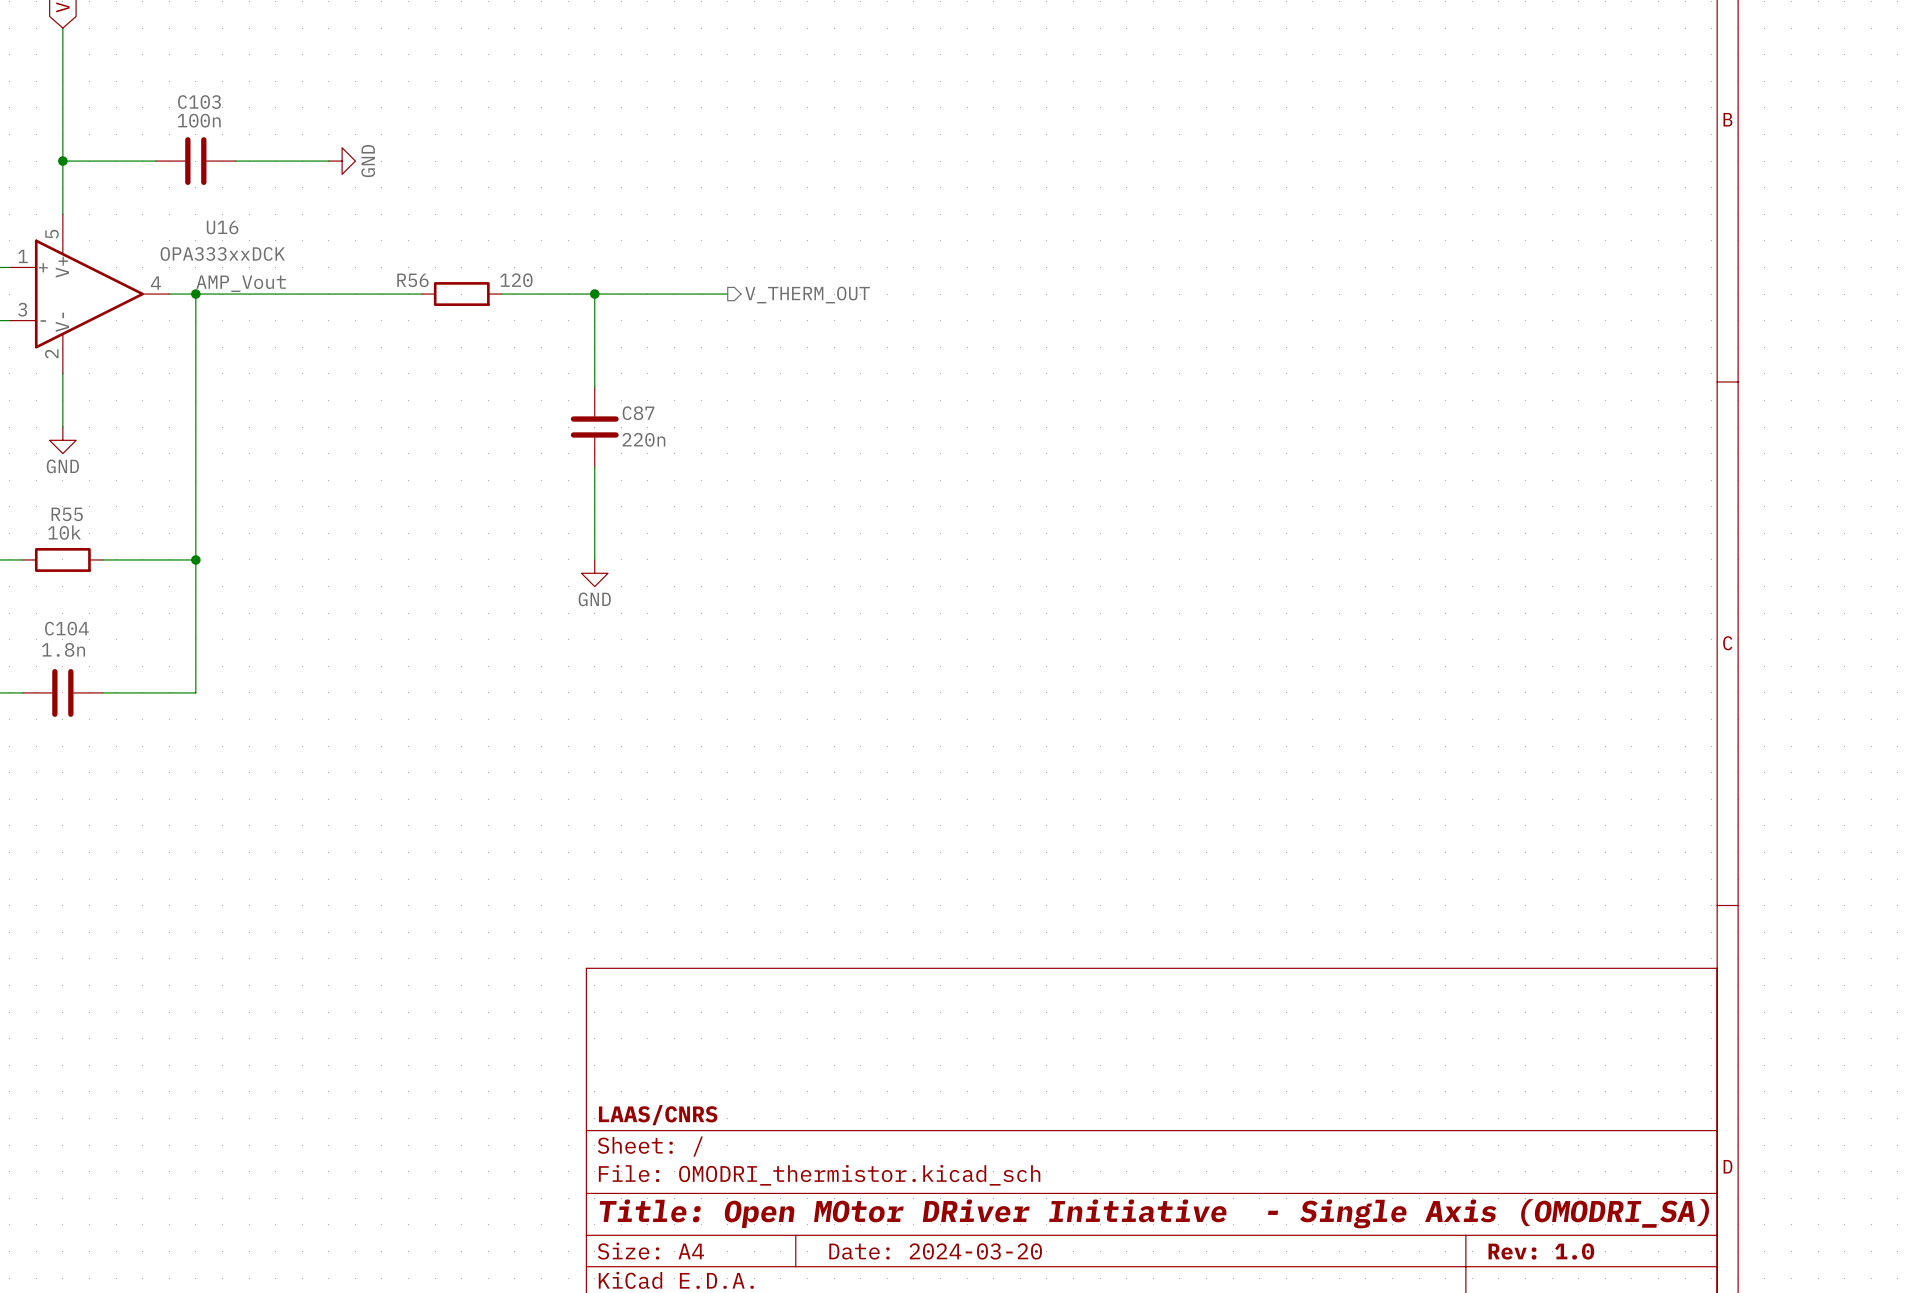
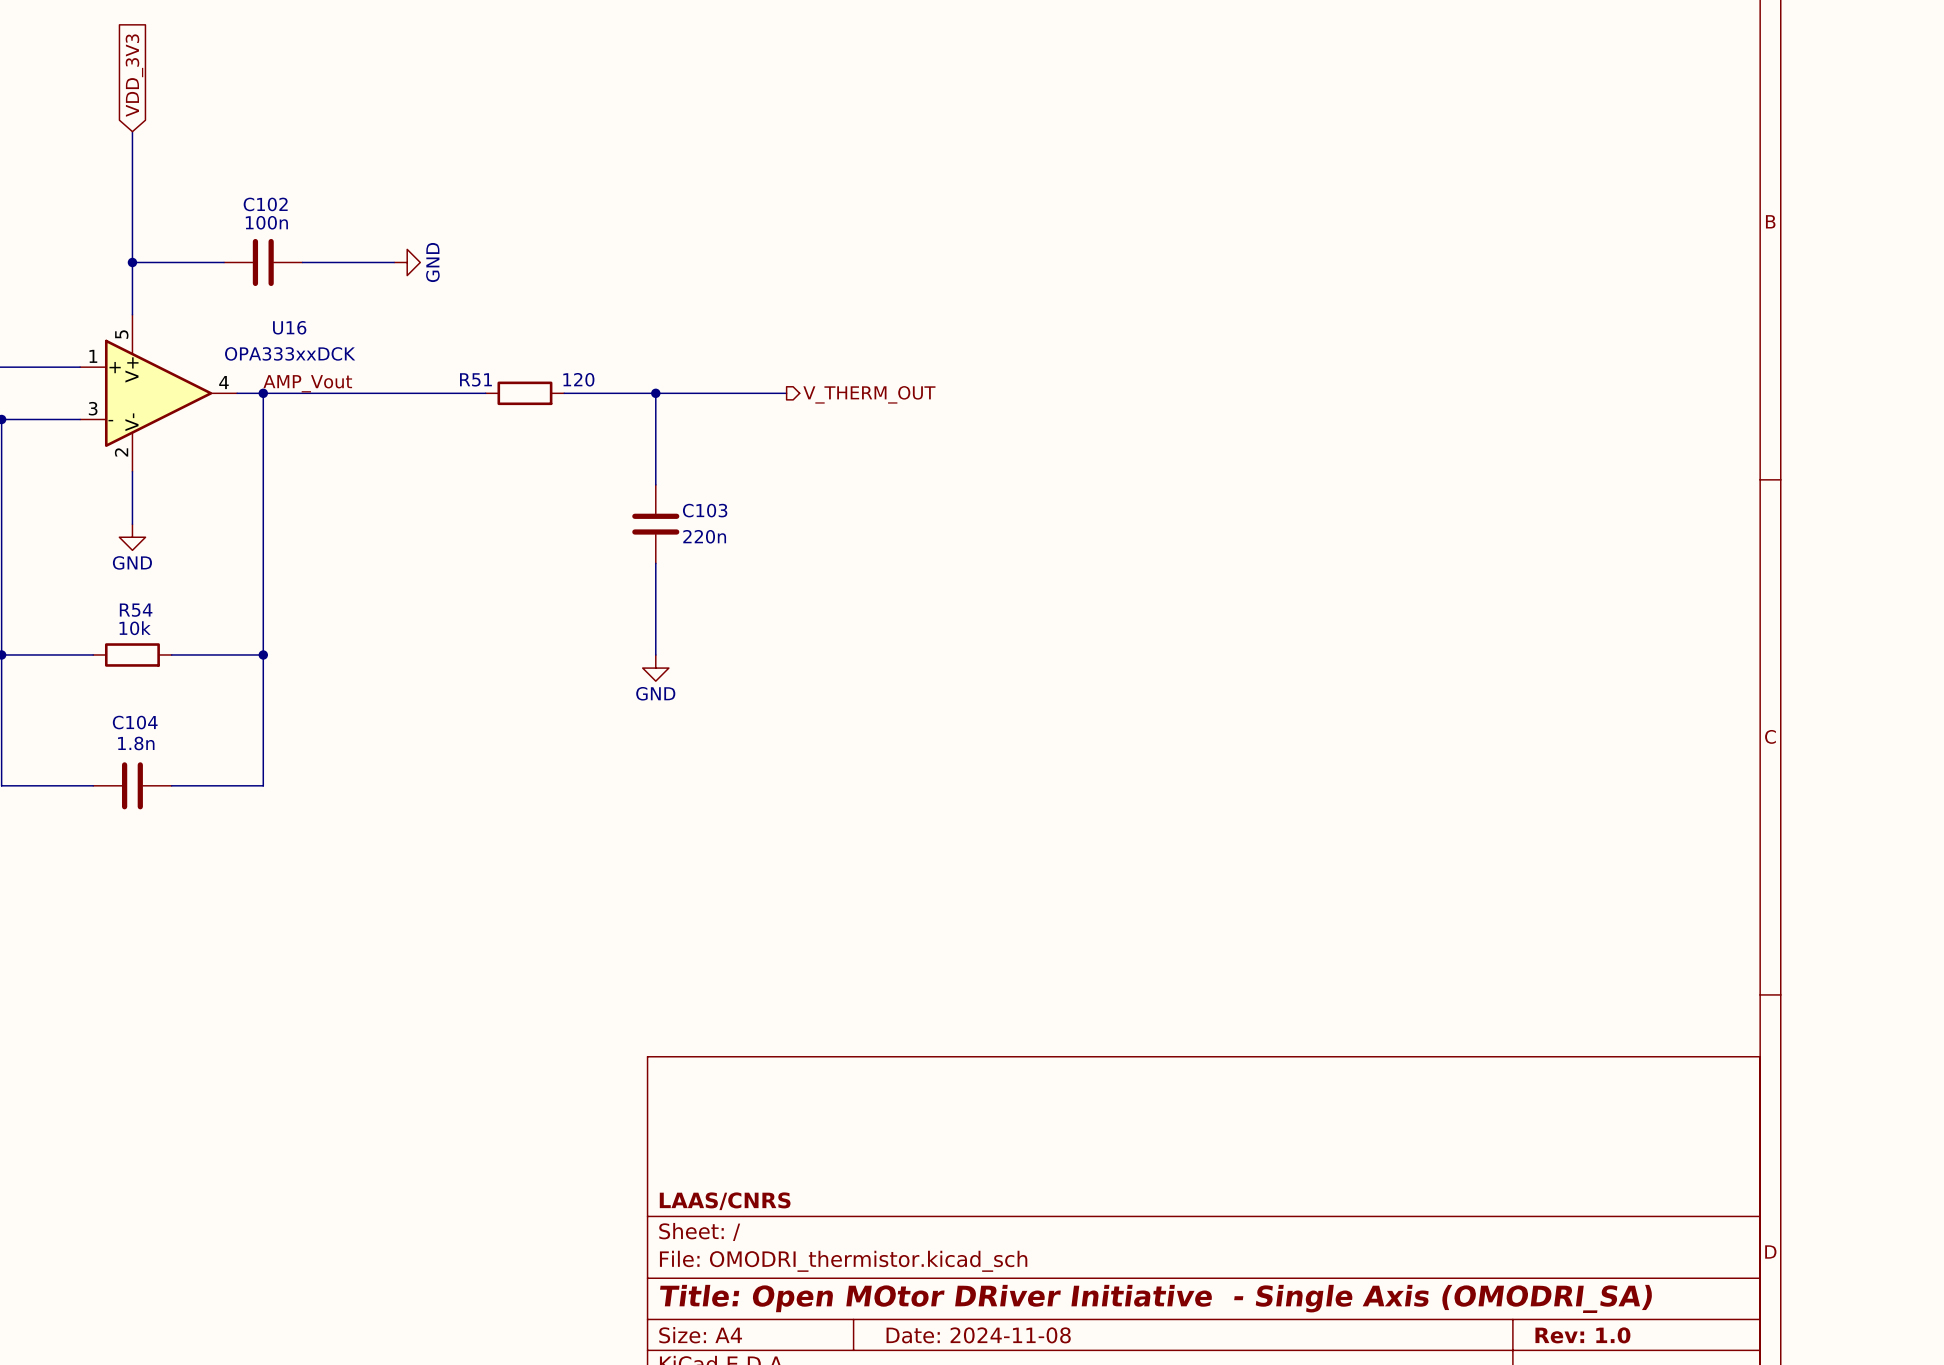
C103 name: C103 (199, 102) -> C102 (265, 204)
R56 name: R56 (412, 280) -> R51 (475, 379)
C87 name: C87 (638, 413) -> C103 (705, 510)
R55 name: R55 (67, 514) -> R54 (136, 610)
title block: Date: 2024-03-20 (935, 1251) -> Date: 2024-11-08 (978, 1335)

